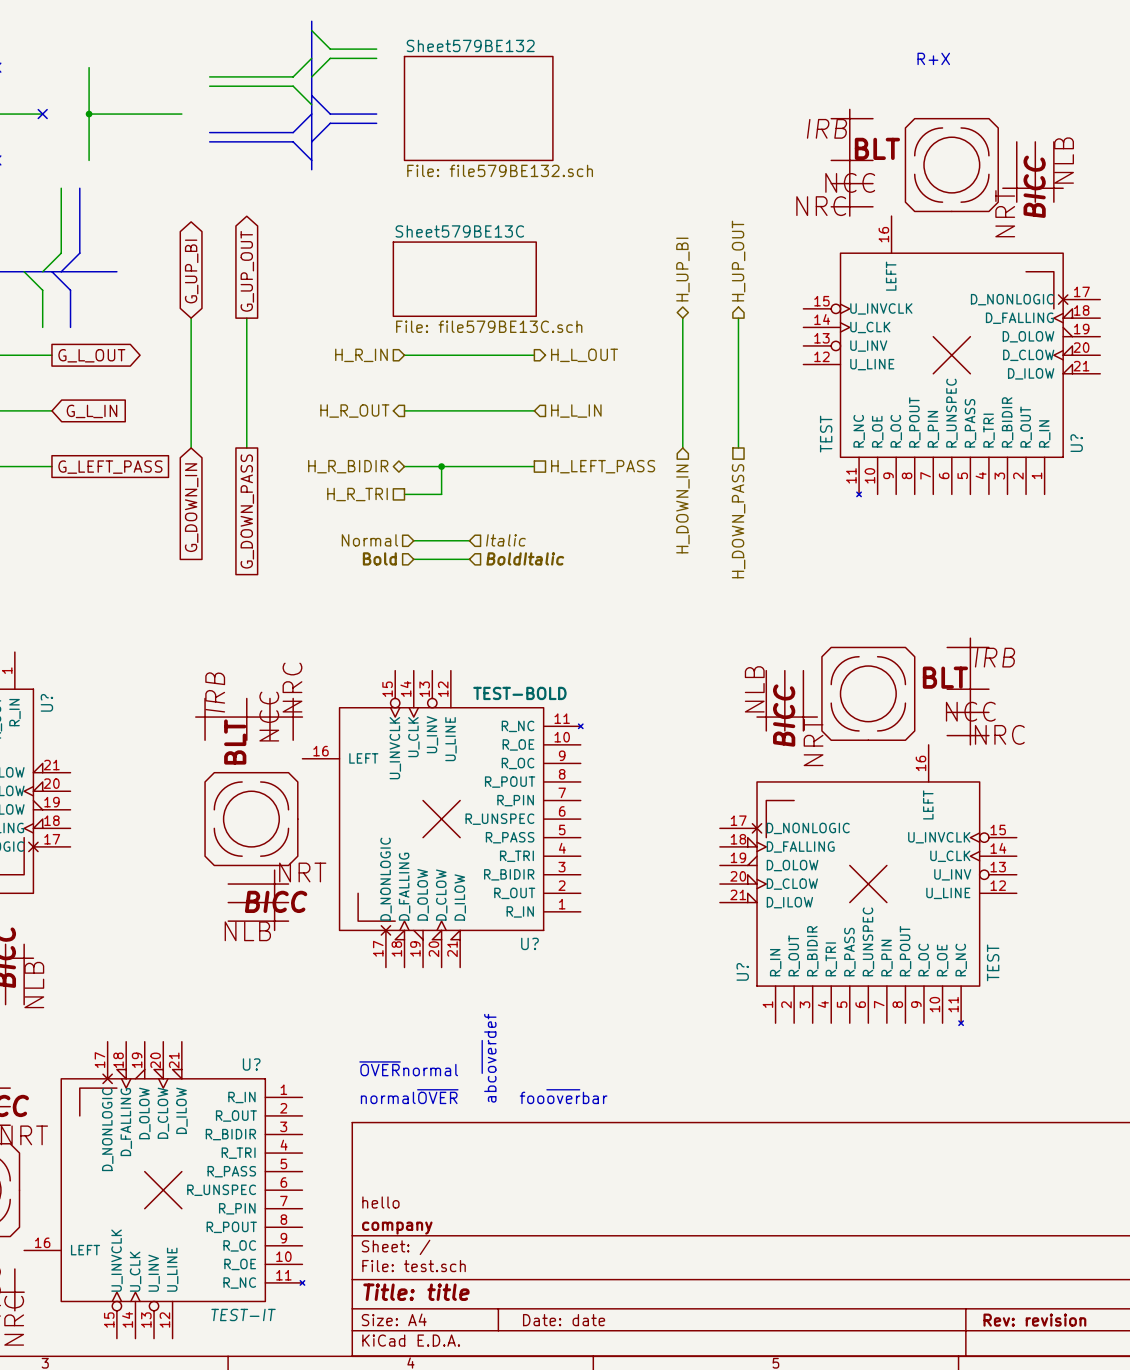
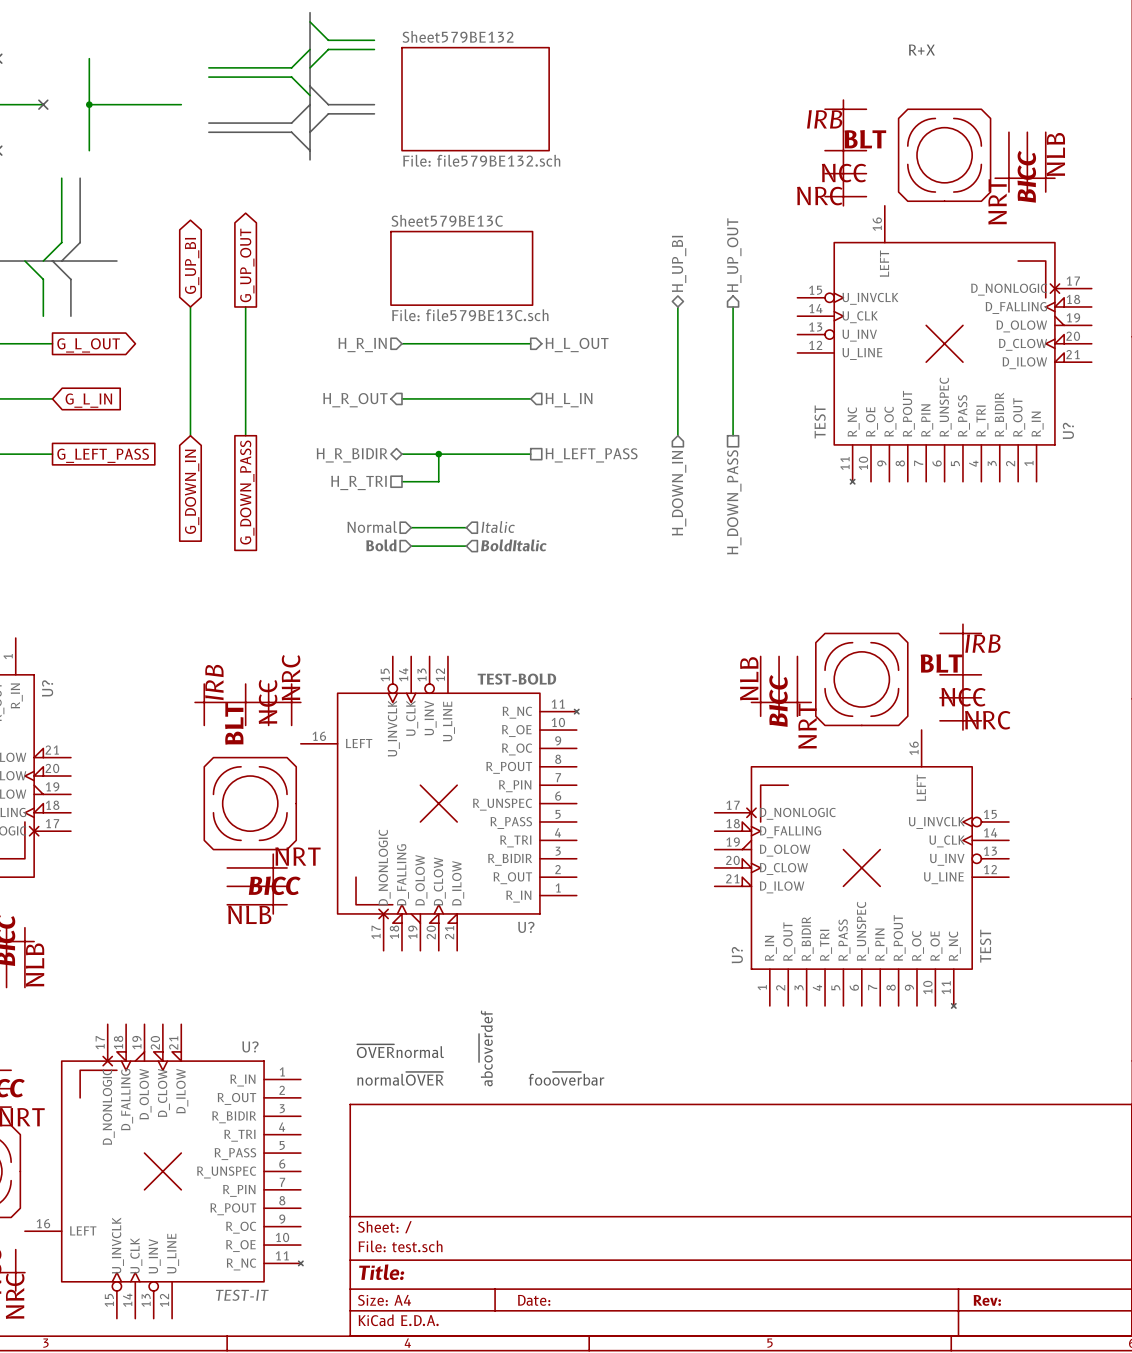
title block: hello (380, 1202) -> none
title block: company (397, 1228) -> none
title block: Title: title (416, 1292) -> Title: (381, 1272)
title block: Date: date (564, 1320) -> Date: (534, 1300)
title block: Rev: revision (1034, 1320) -> Rev: (987, 1300)

